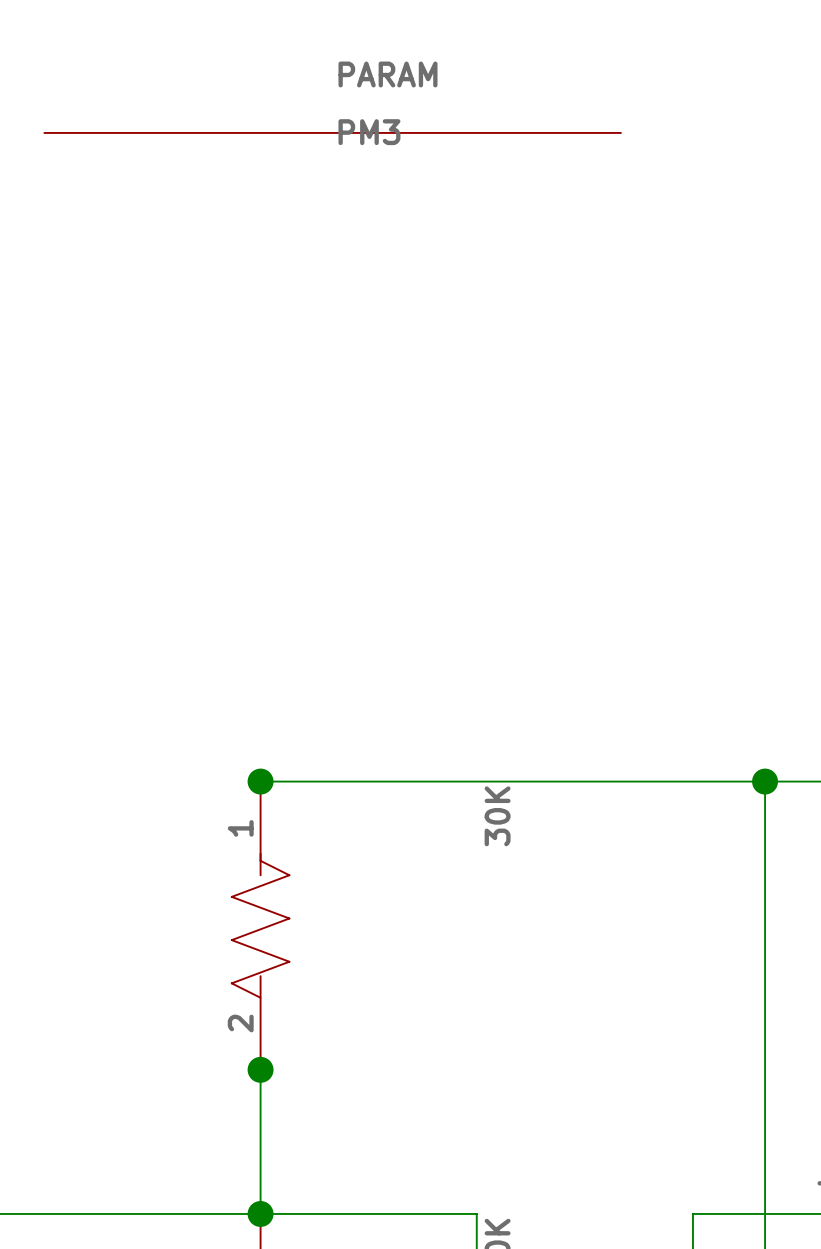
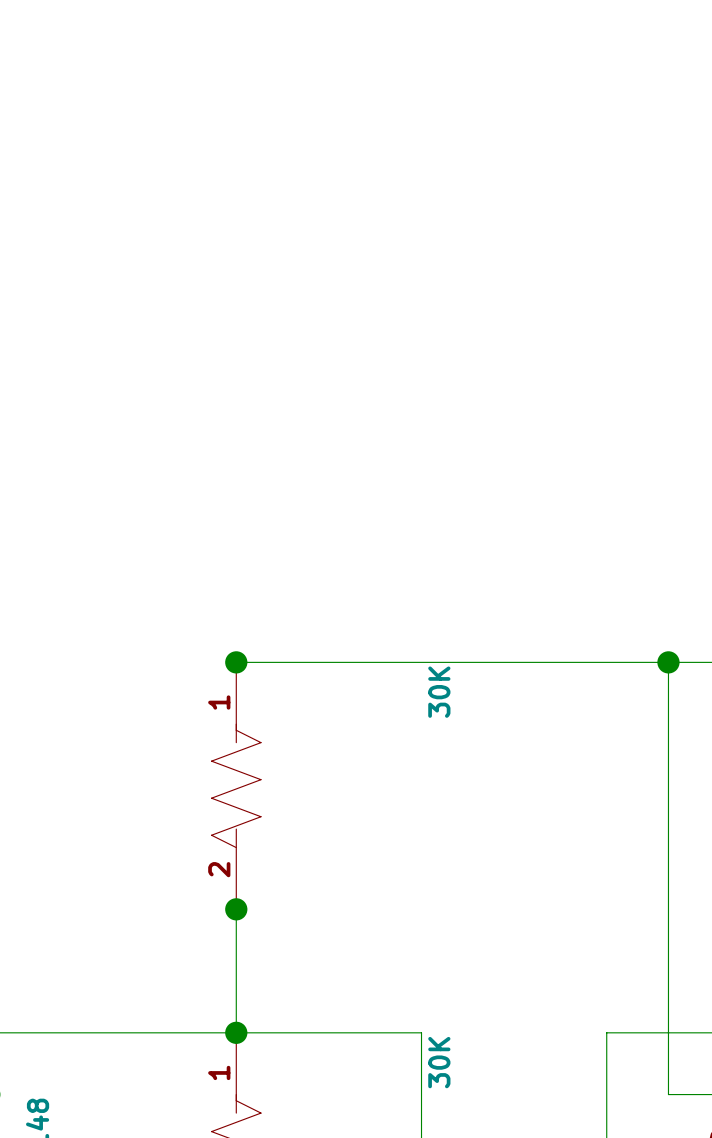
PM3: PARAM (332, 132) -> none

